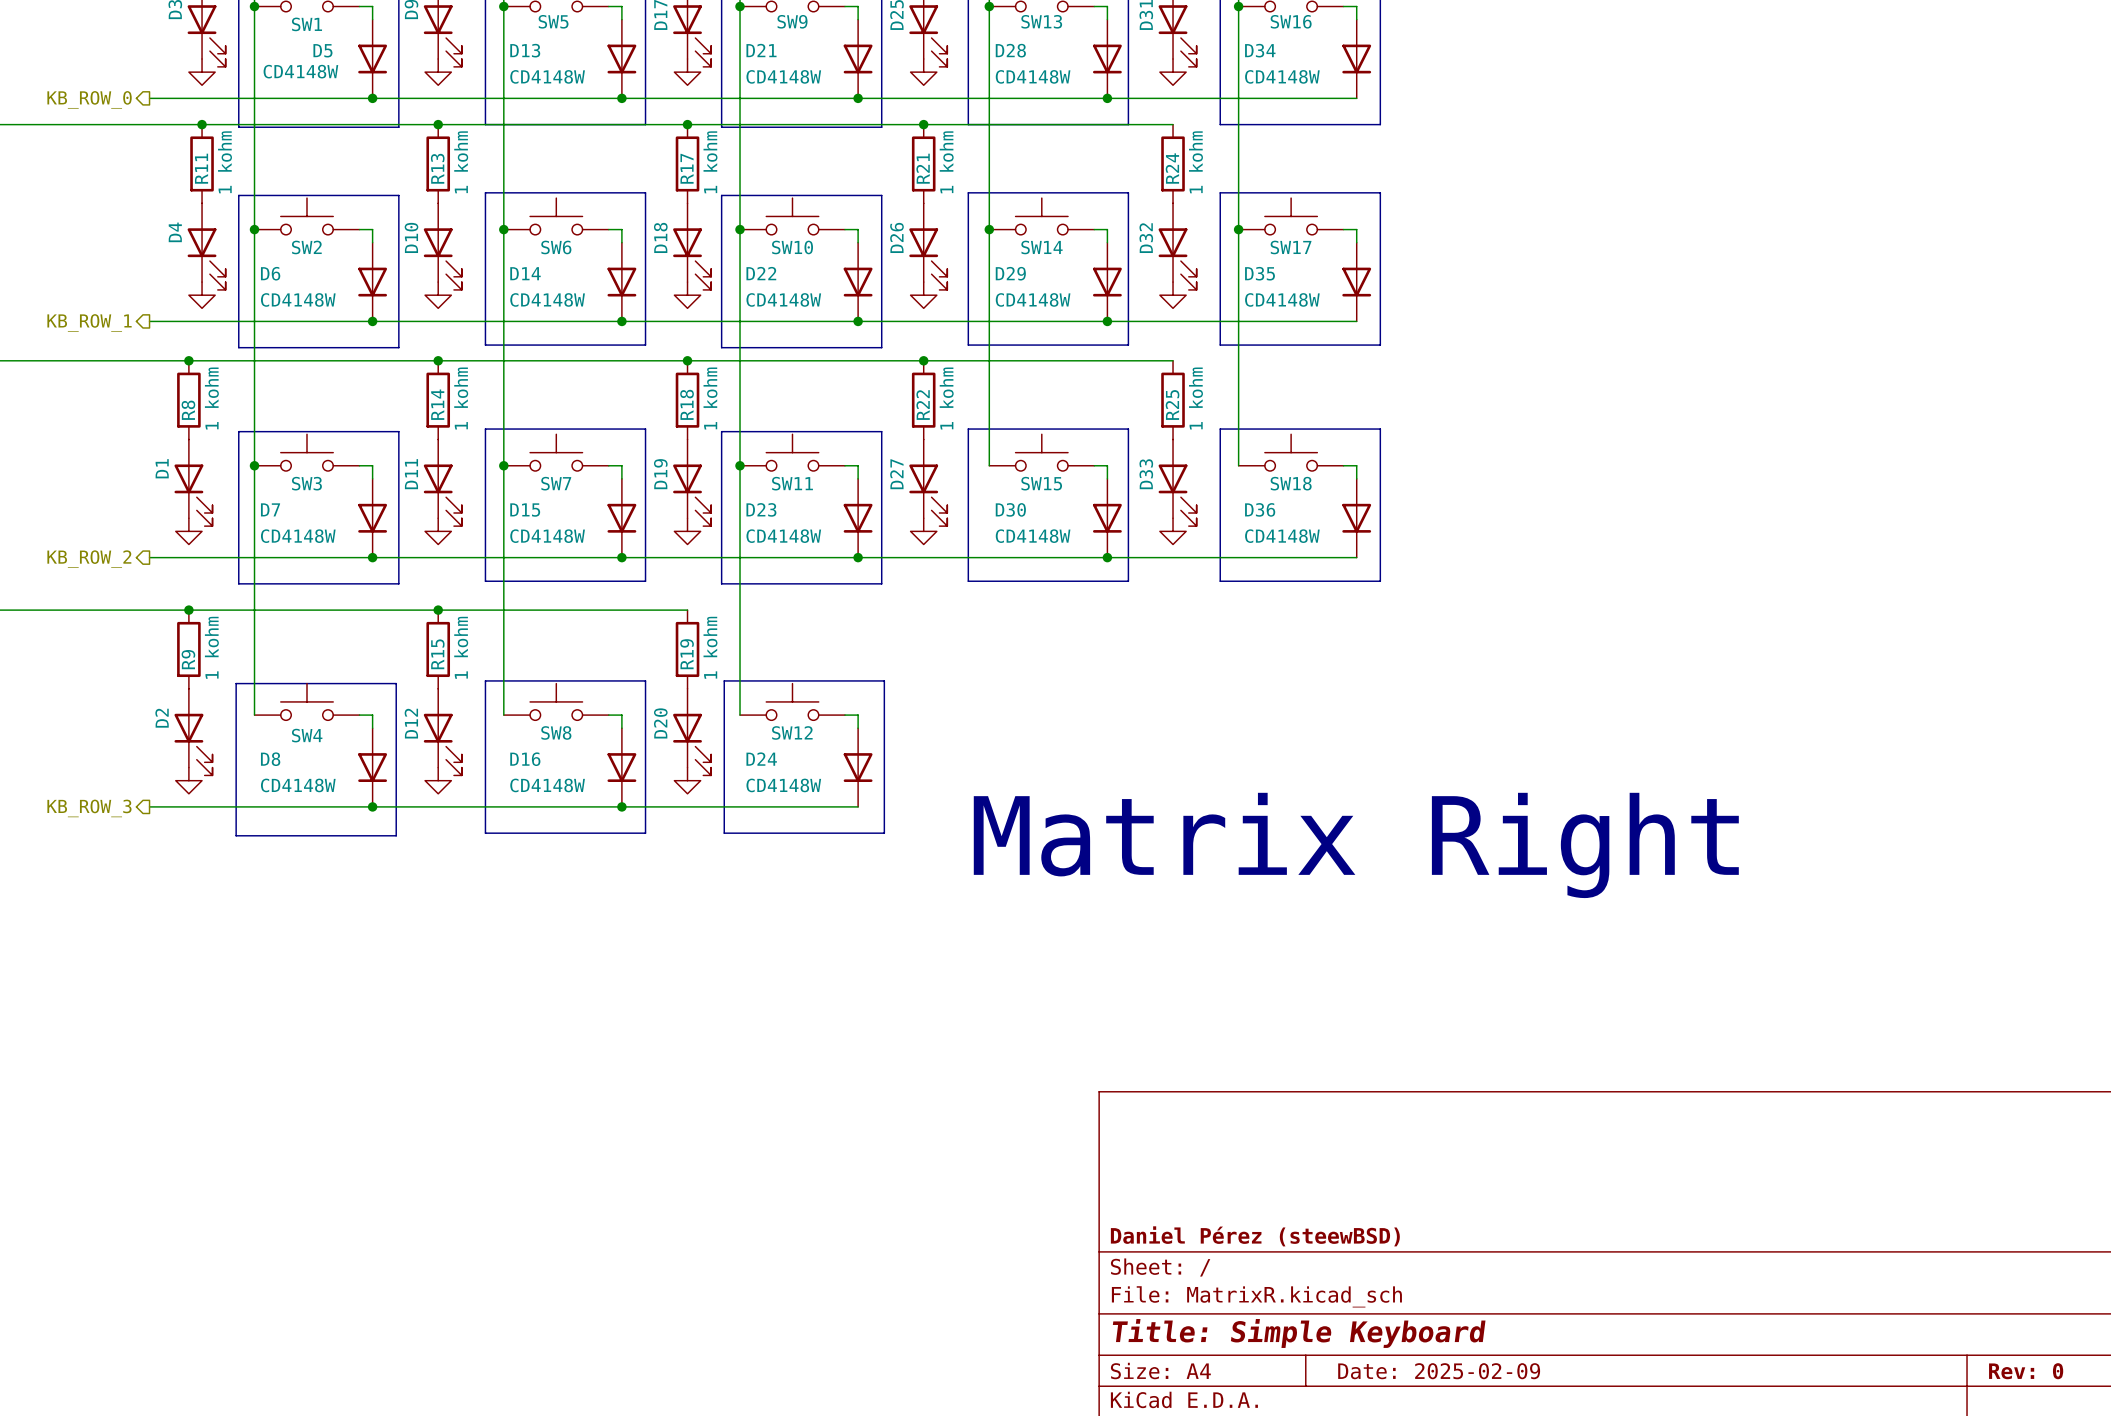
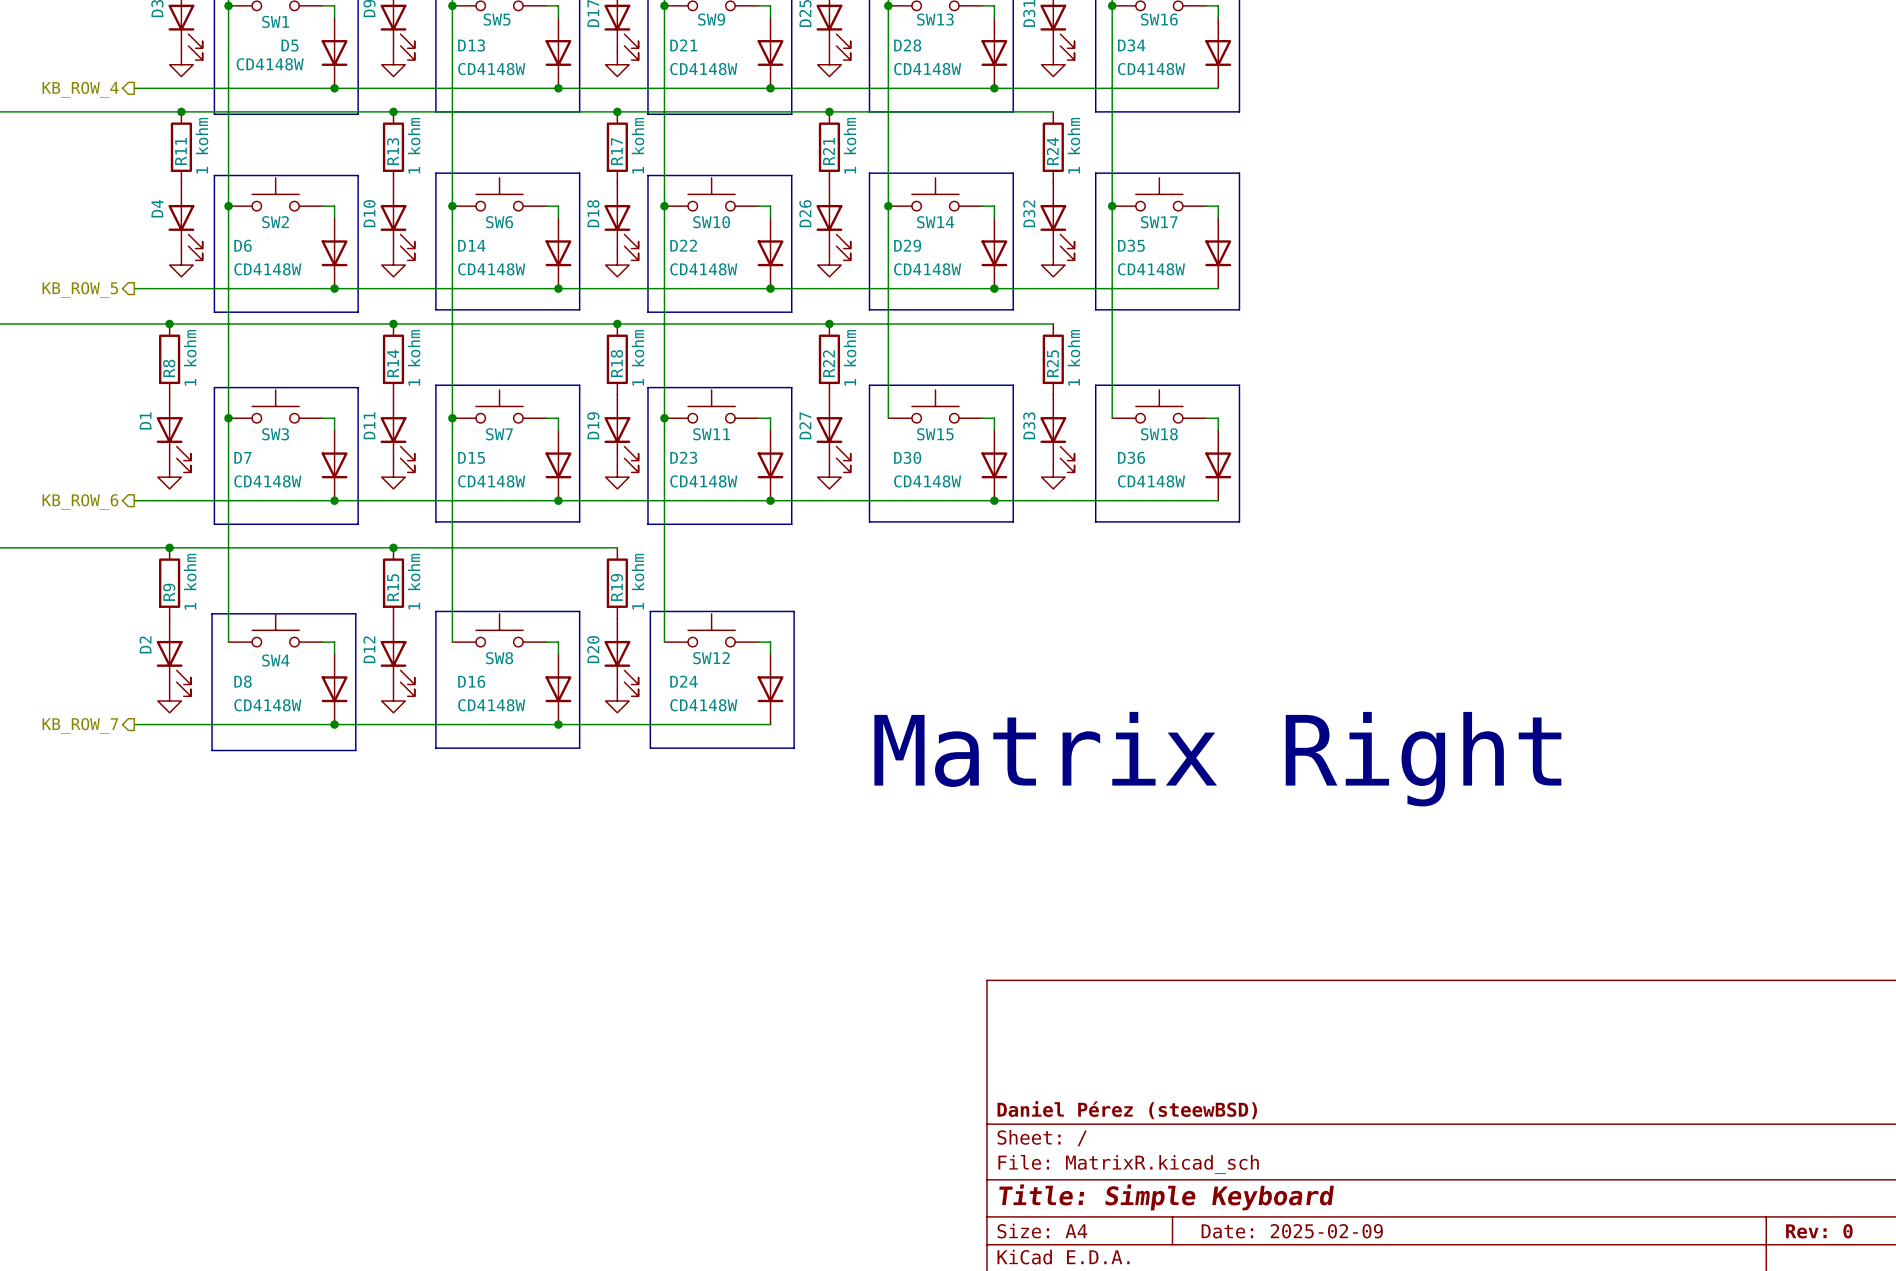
hierarchical label: KB_ROW_0 (89, 99) -> KB_ROW_4 (80, 89)
hierarchical label: KB_ROW_1 (89, 322) -> KB_ROW_5 (80, 289)
hierarchical label: KB_ROW_2 (89, 559) -> KB_ROW_6 (80, 502)
hierarchical label: KB_ROW_3 (89, 808) -> KB_ROW_7 (80, 725)

